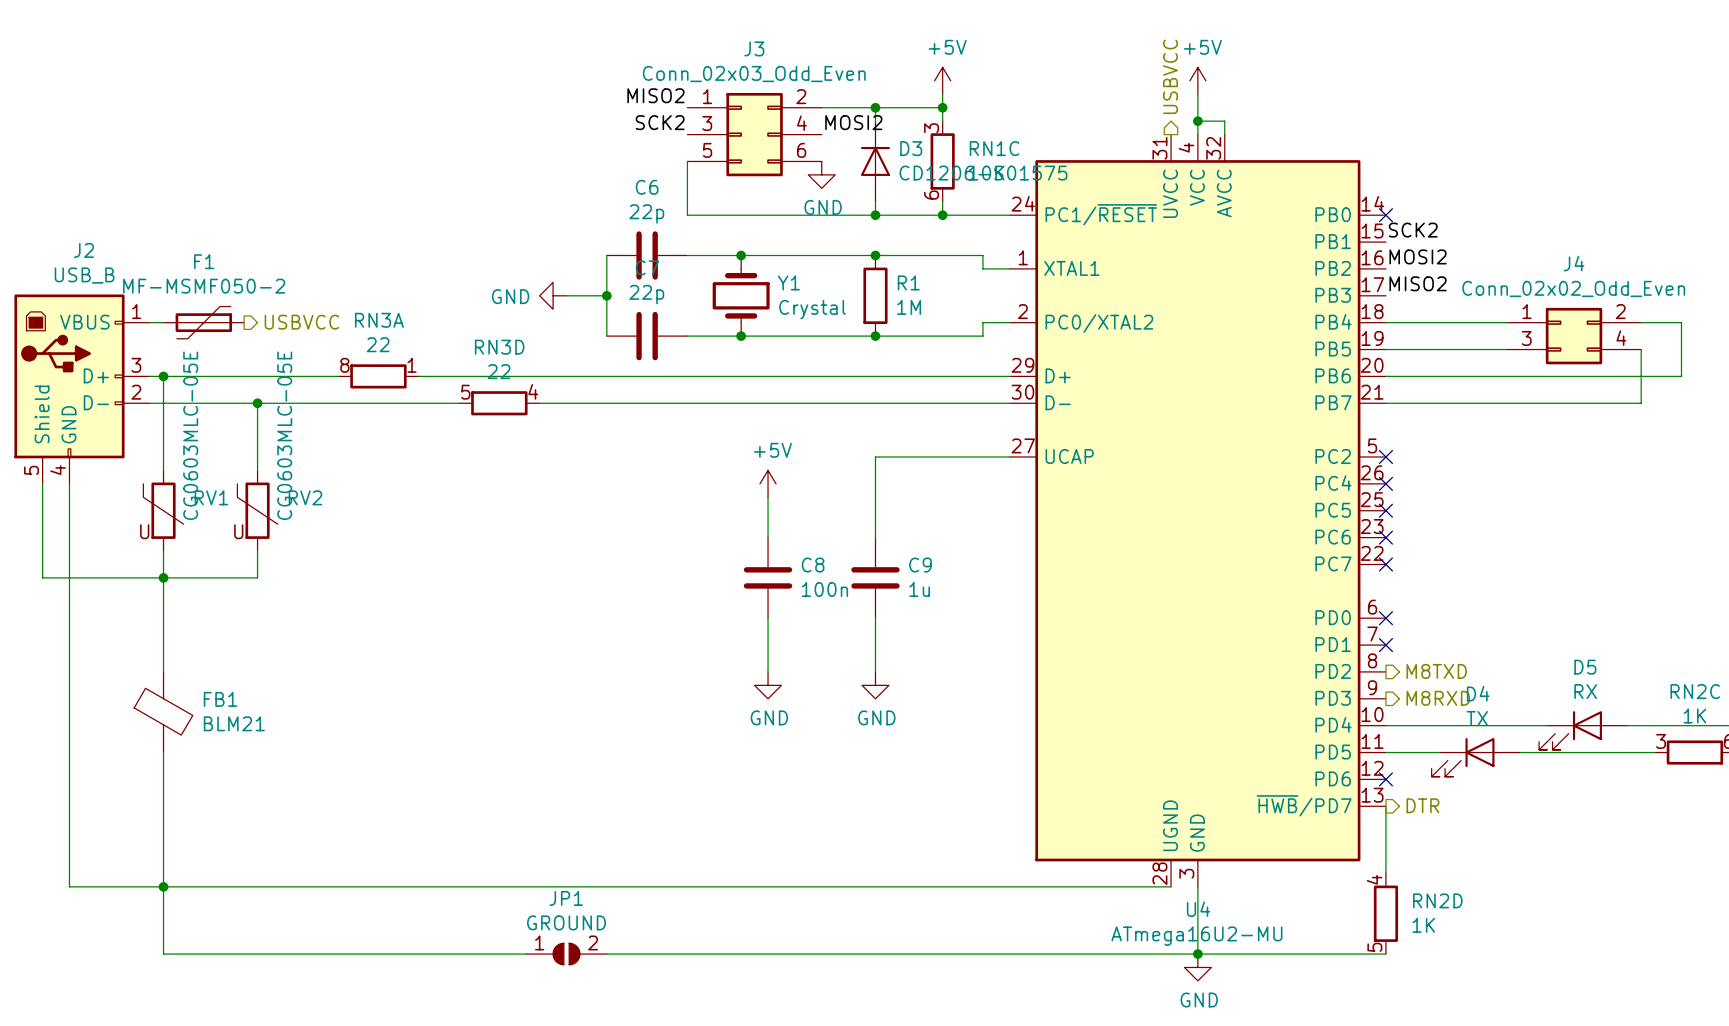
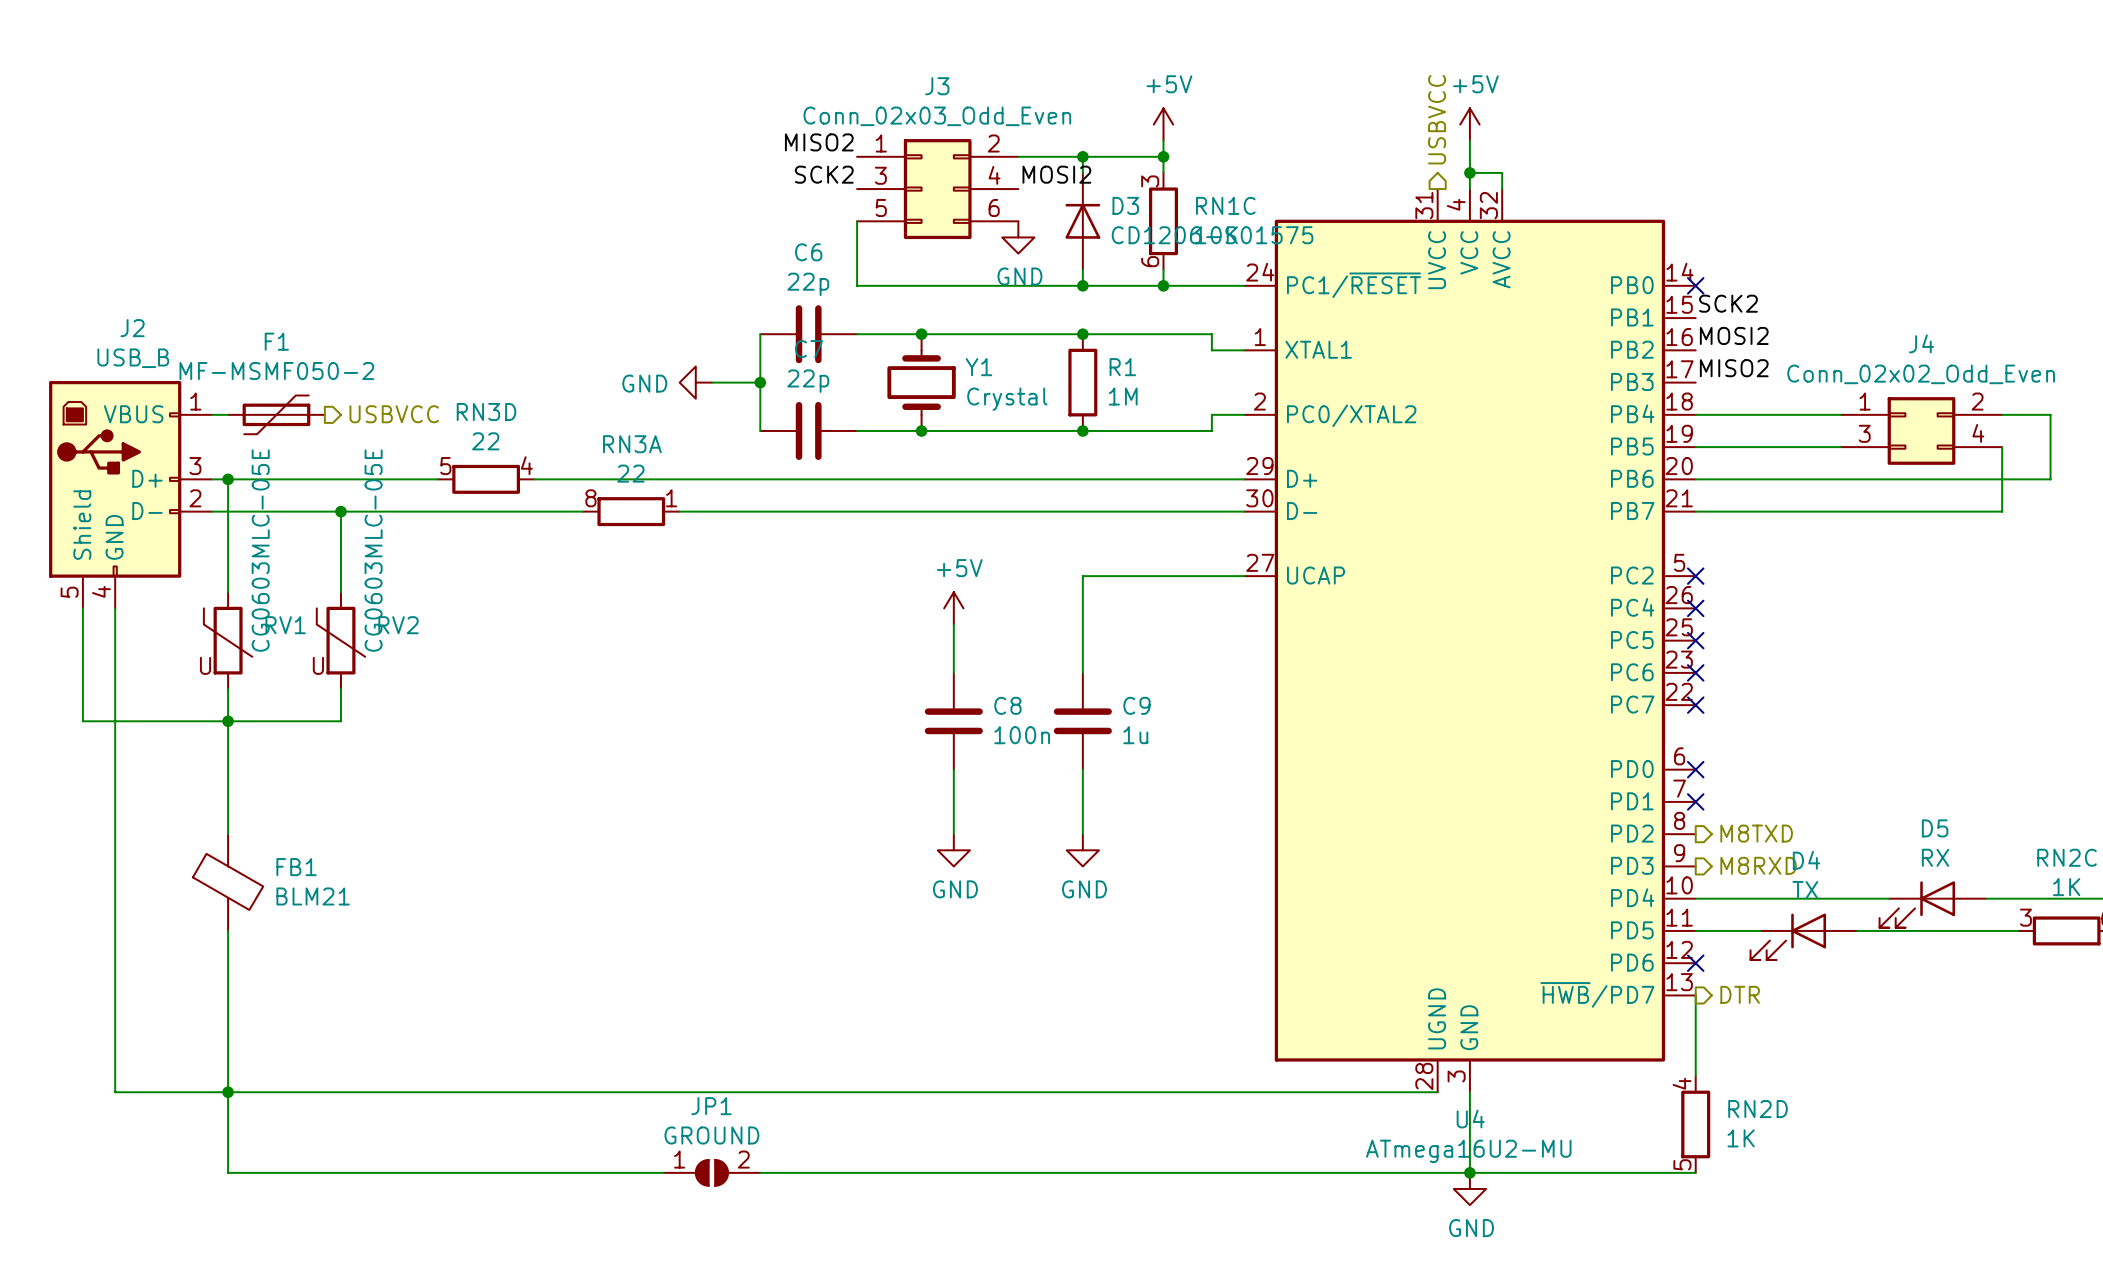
RN3A position: (378, 376) -> (631, 511)
RN3D position: (499, 403) -> (486, 479)

